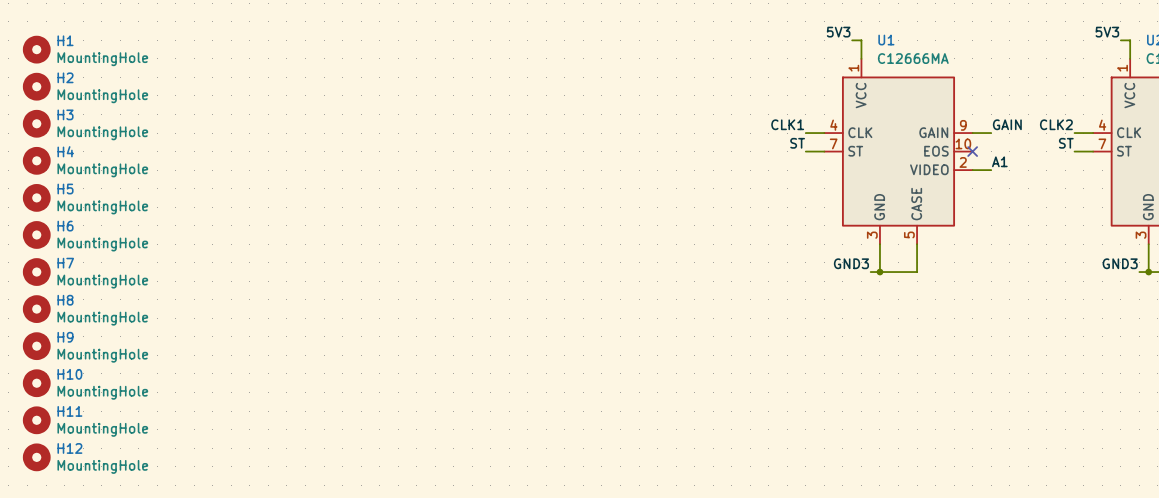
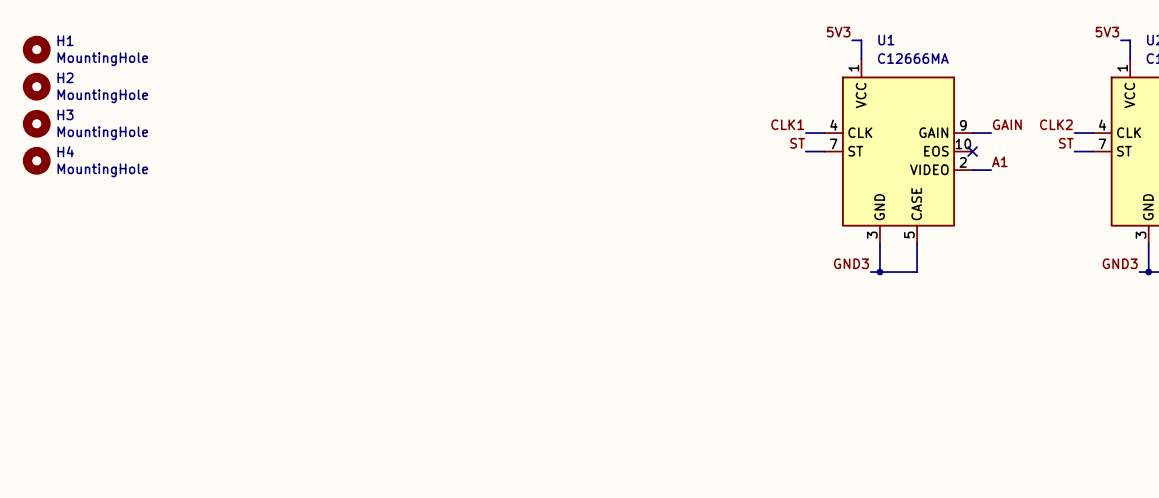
H5: MountingHole (36, 197) -> none
H6: MountingHole (36, 234) -> none
H7: MountingHole (36, 272) -> none
H8: MountingHole (36, 309) -> none
H9: MountingHole (36, 346) -> none
H10: MountingHole (36, 383) -> none
H11: MountingHole (36, 420) -> none
H12: MountingHole (36, 457) -> none

